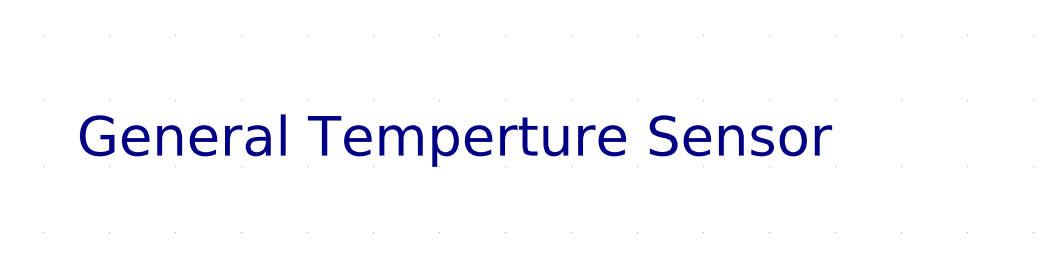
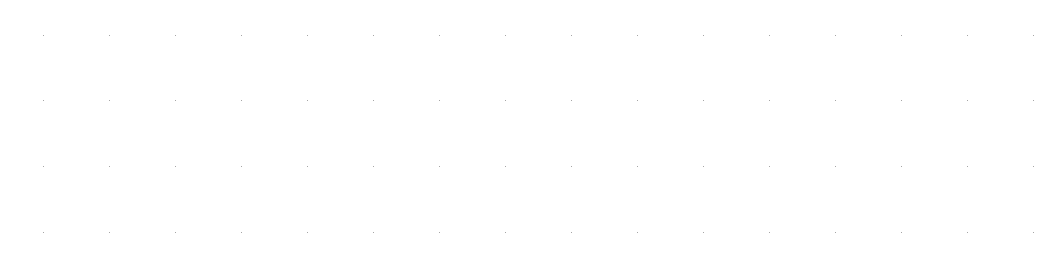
text: General Temperture Sensor (456, 140) -> none

